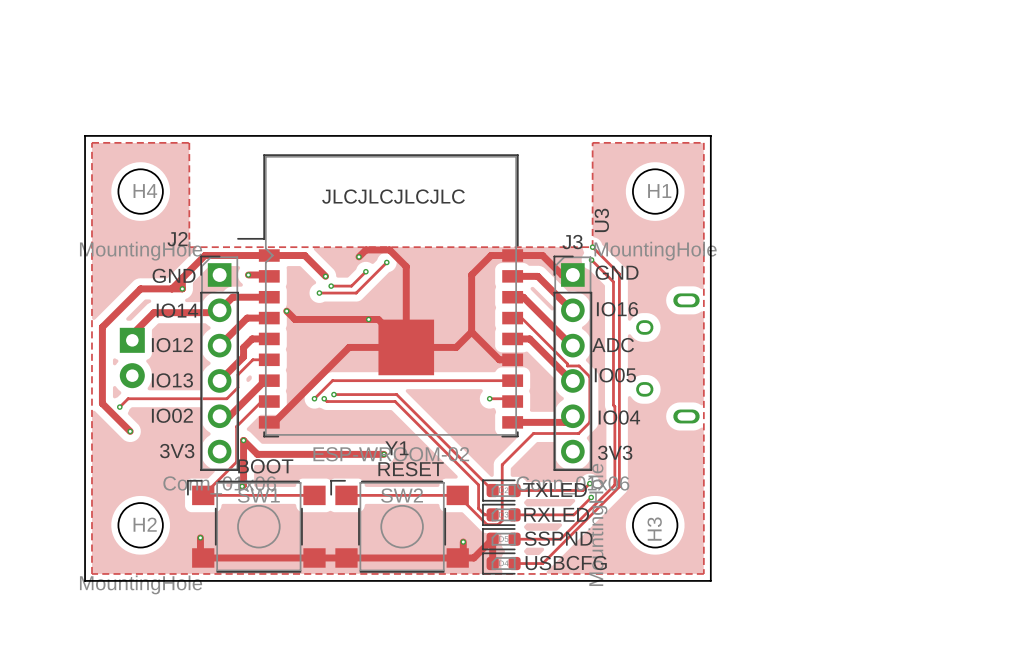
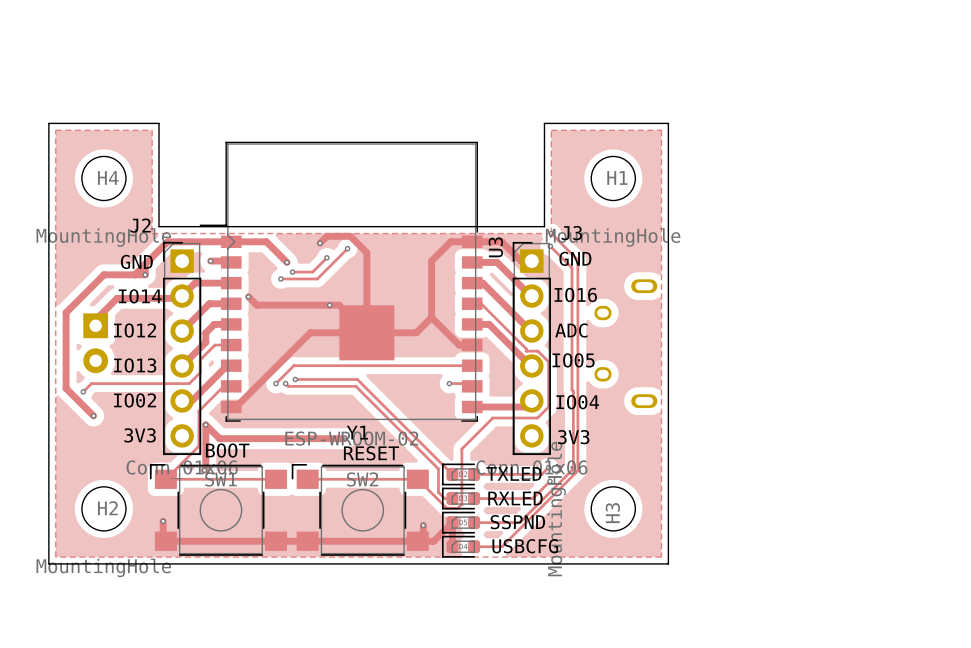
board edge: (196, 135) (585, 135) -> (159, 123) (159, 226) (544, 226) (544, 123)
text: JLCJLCJLCJLC (393, 196) -> none
U3 name position: U3 (601, 220) -> U3 (495, 247)
J3 name position: J3 (572, 242) -> J3 (571, 233)

